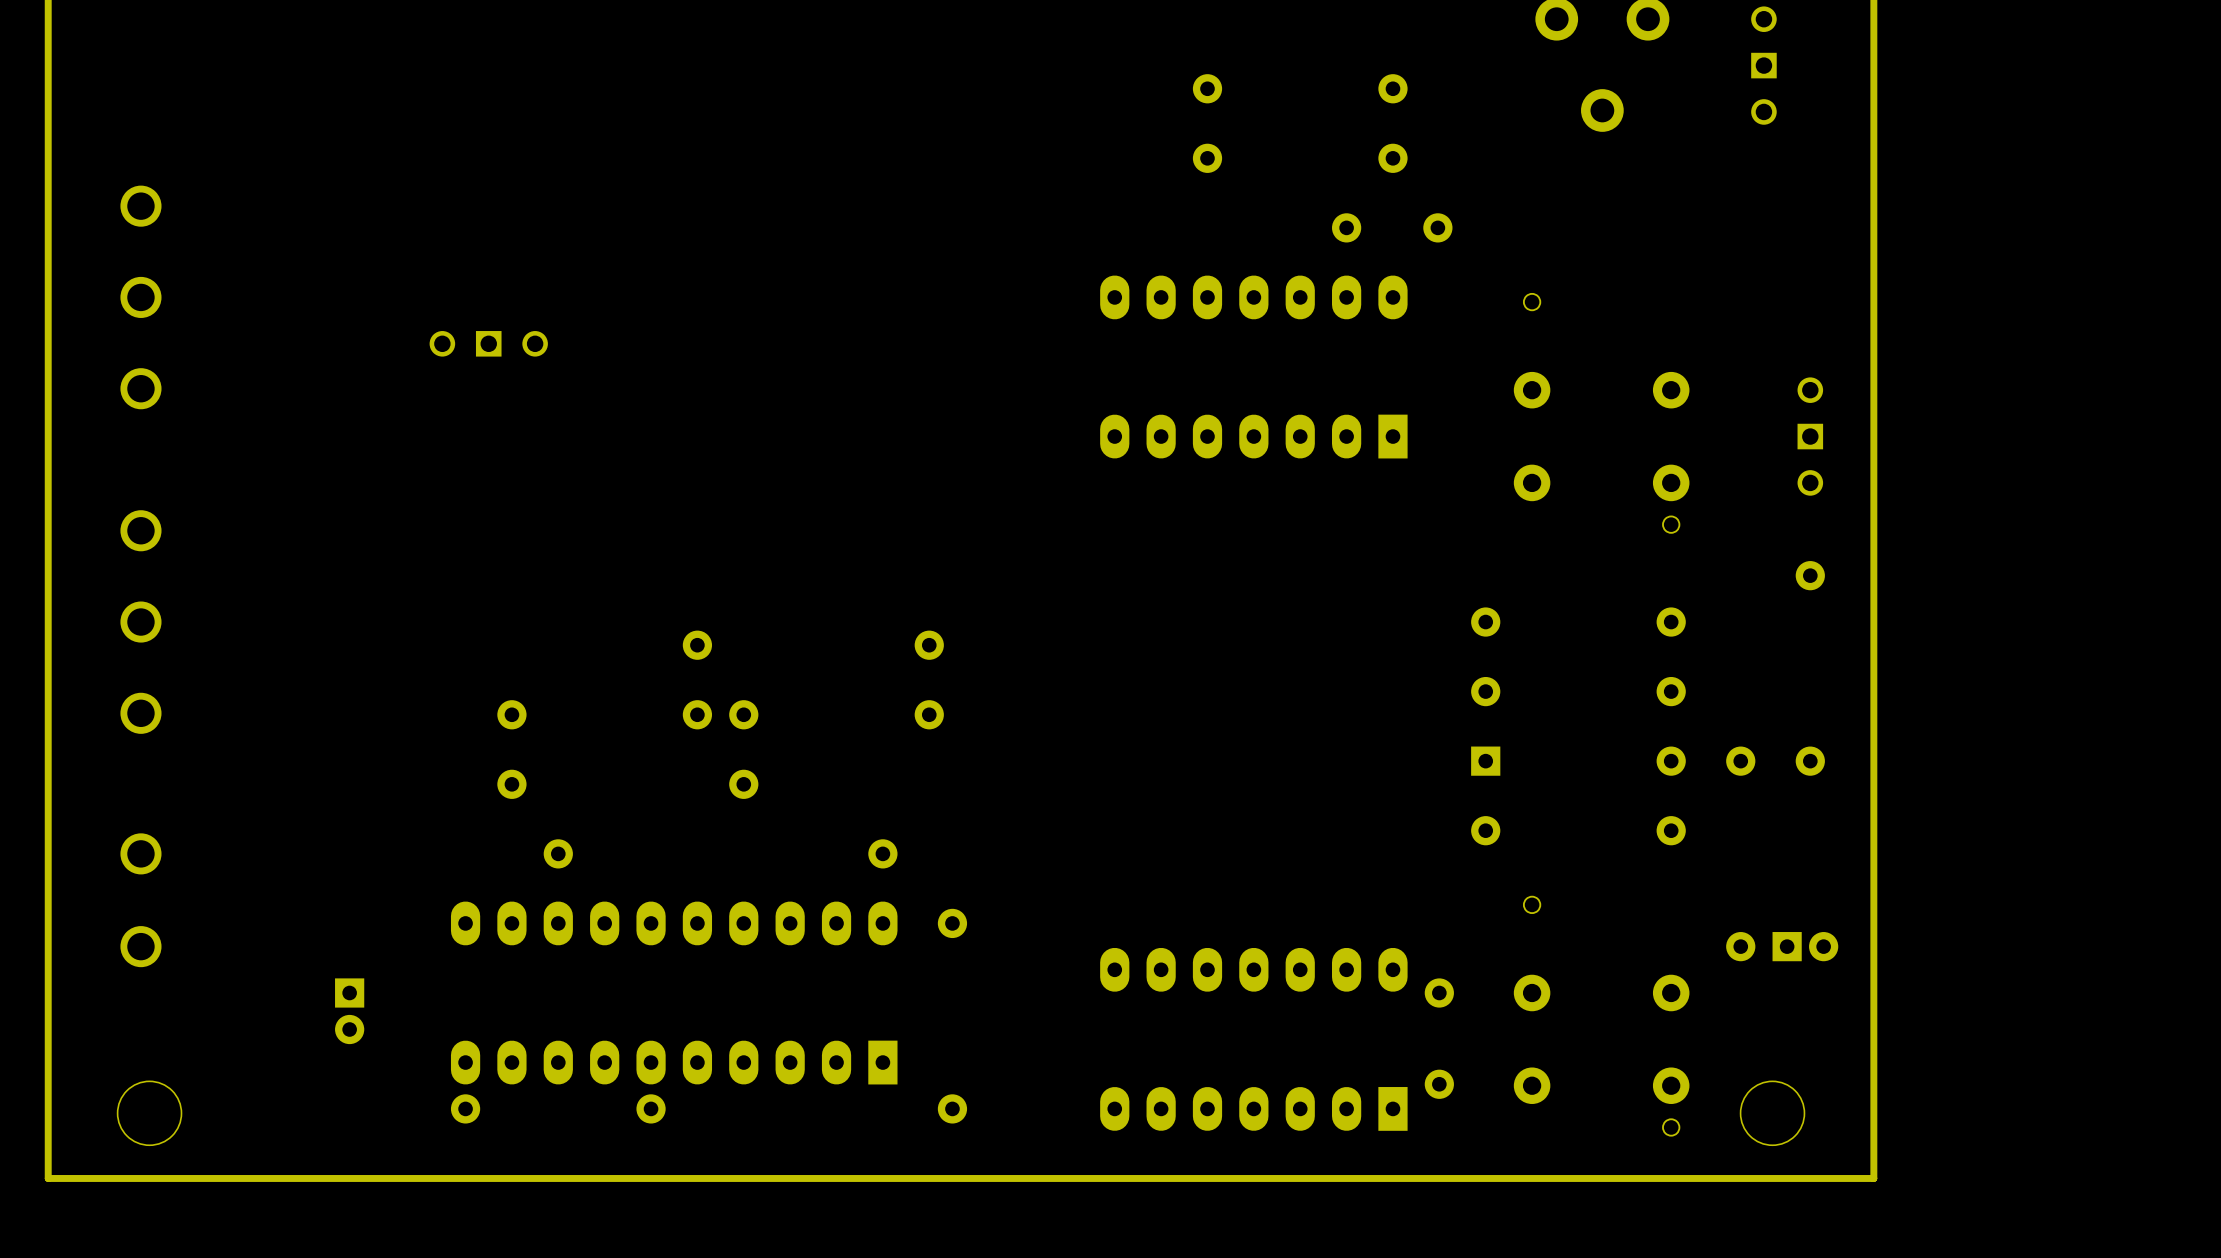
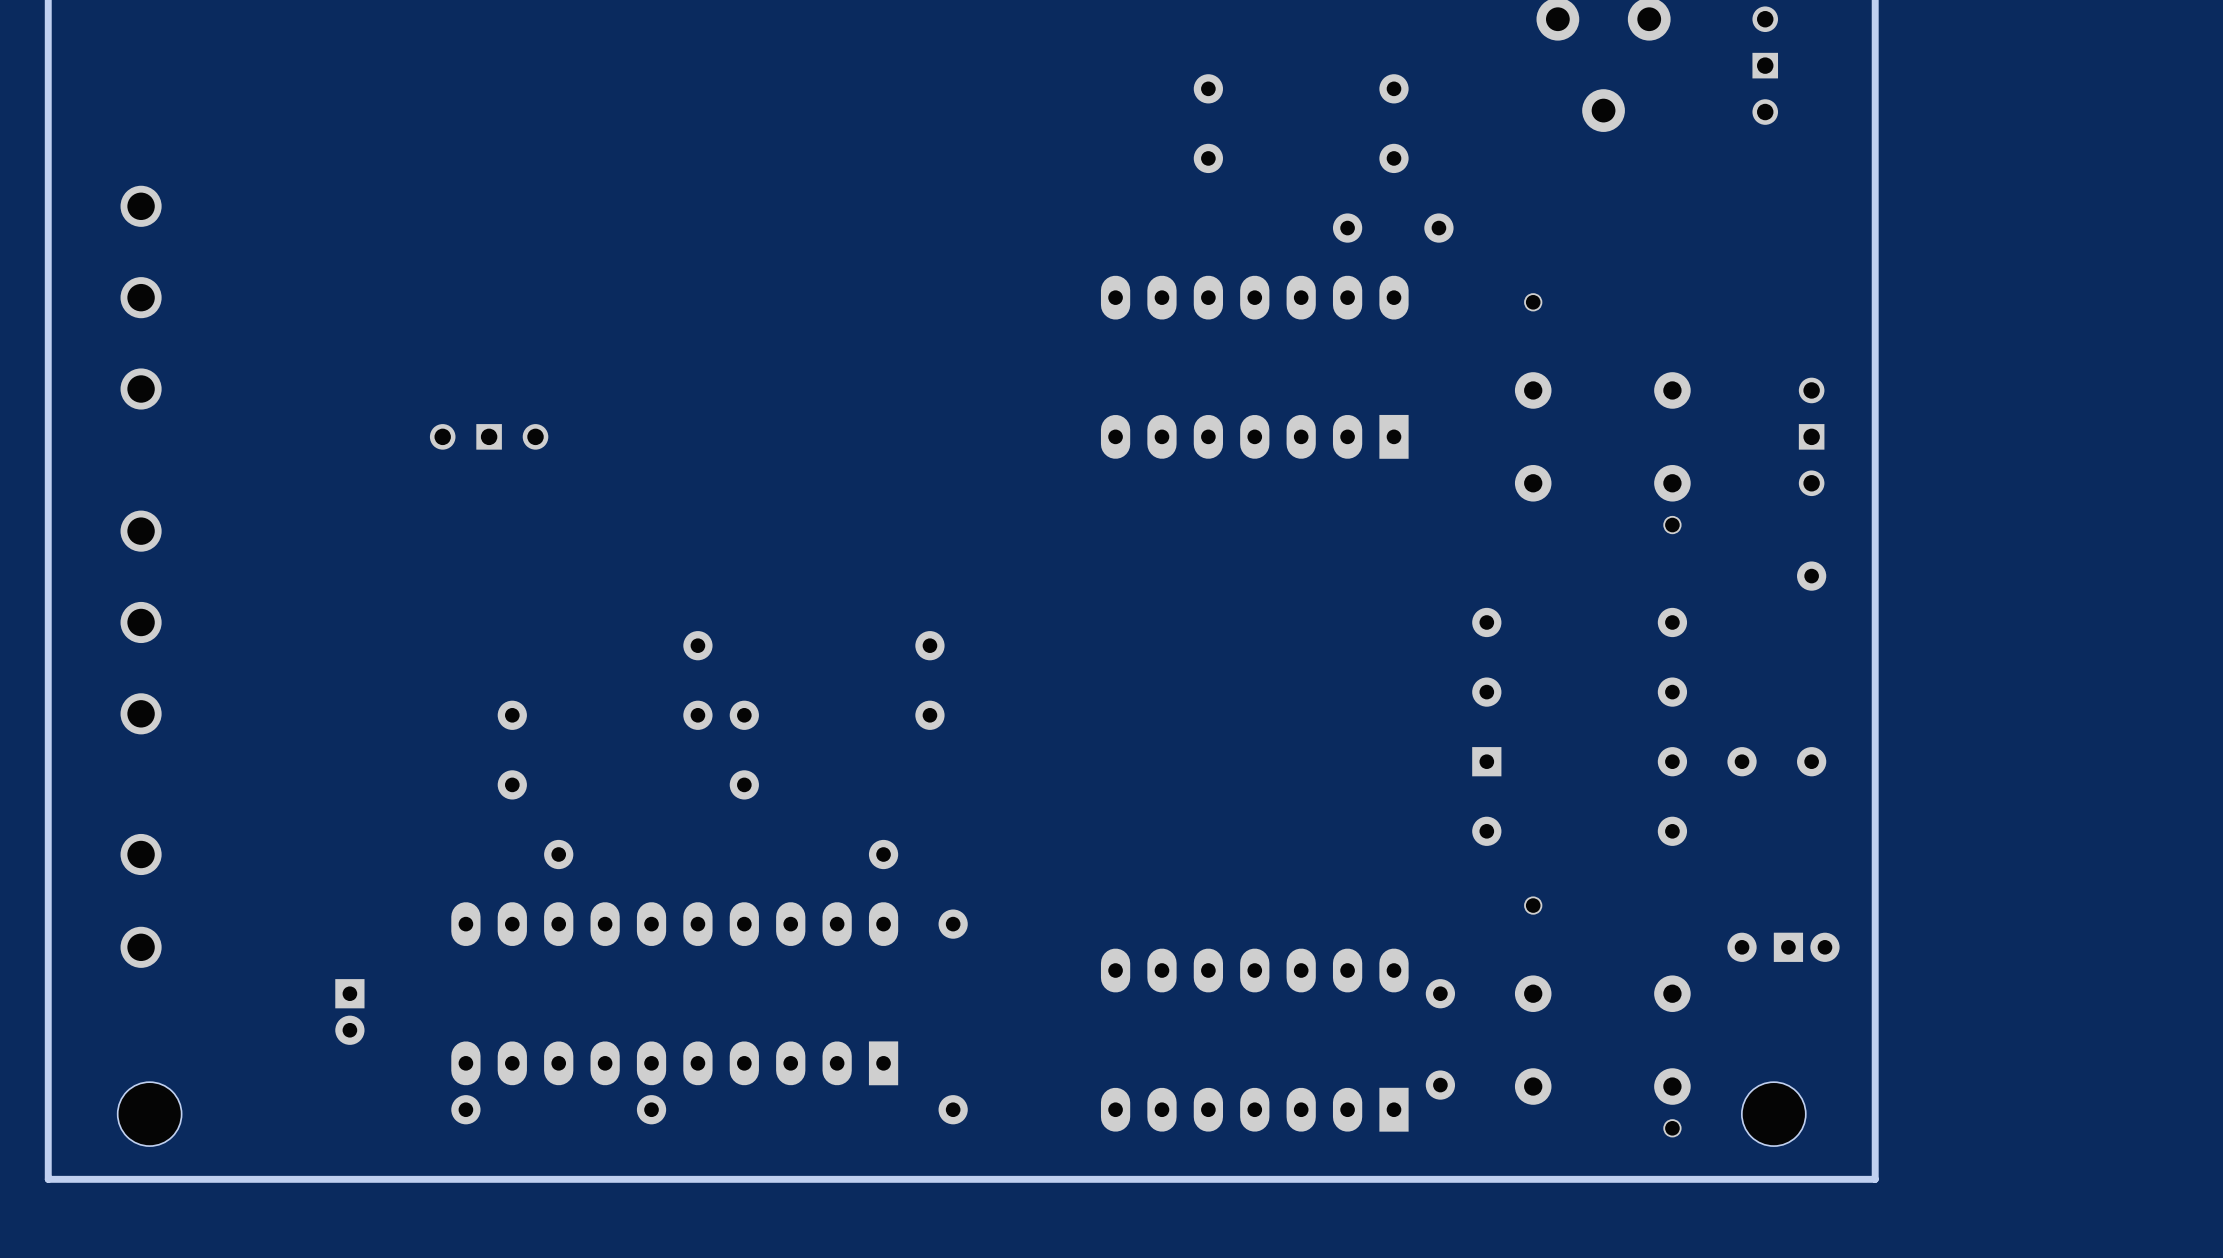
part position: (488, 343) -> (489, 436)

